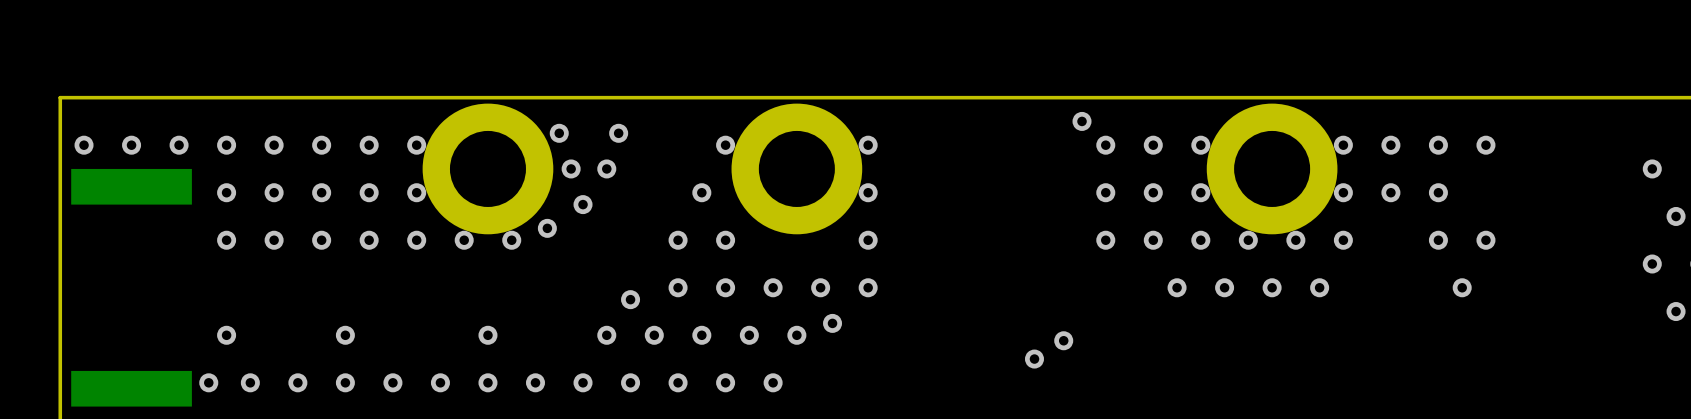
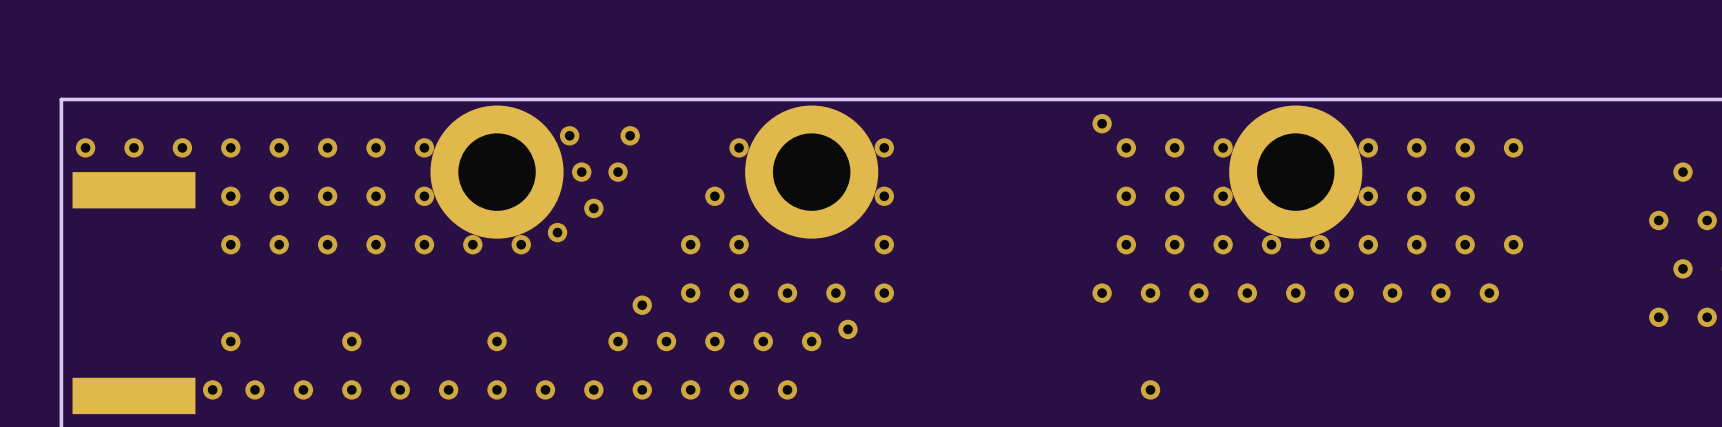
via: none -> (1658, 220)
via: none -> (1416, 244)
via: none -> (1102, 293)
via: none -> (1150, 293)
via: none -> (1392, 293)
via: none -> (1440, 293)
via: none -> (1658, 317)
via: (1063, 340) -> none
via: (1034, 359) -> none
via: none -> (1150, 389)

